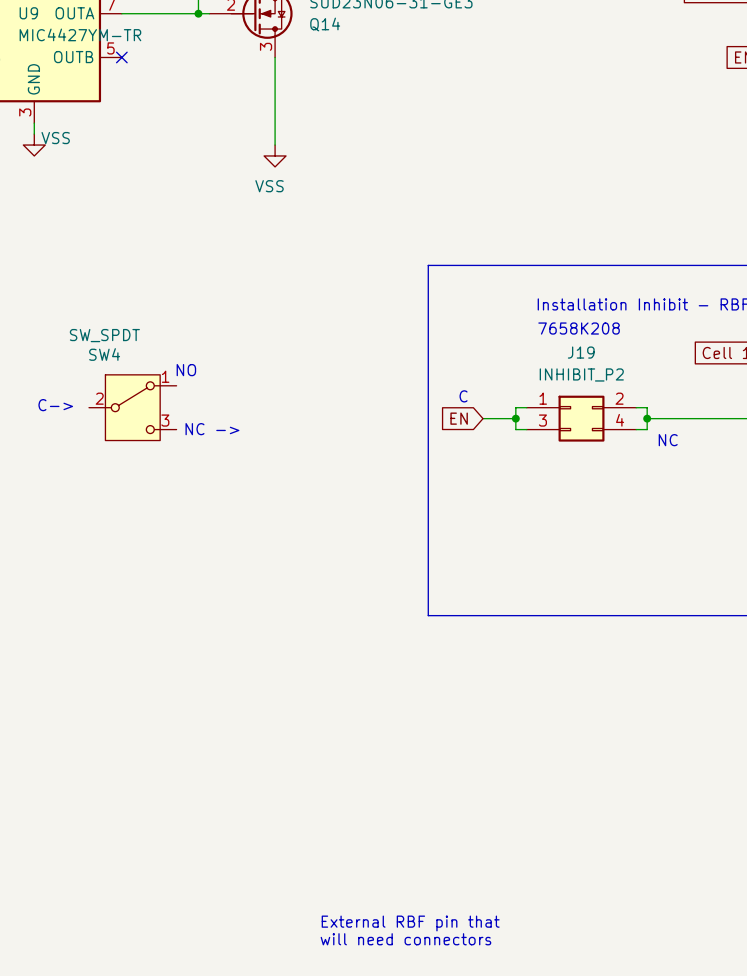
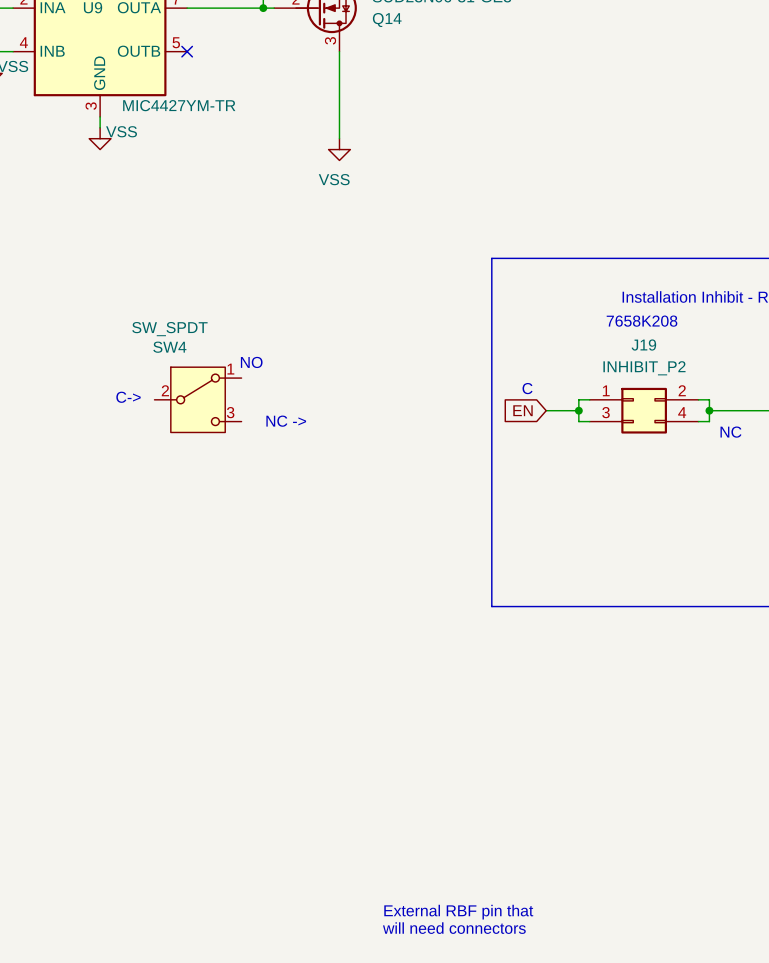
U9 value position: MIC4427YM-TR (80, 34) -> MIC4427YM-TR (179, 105)

